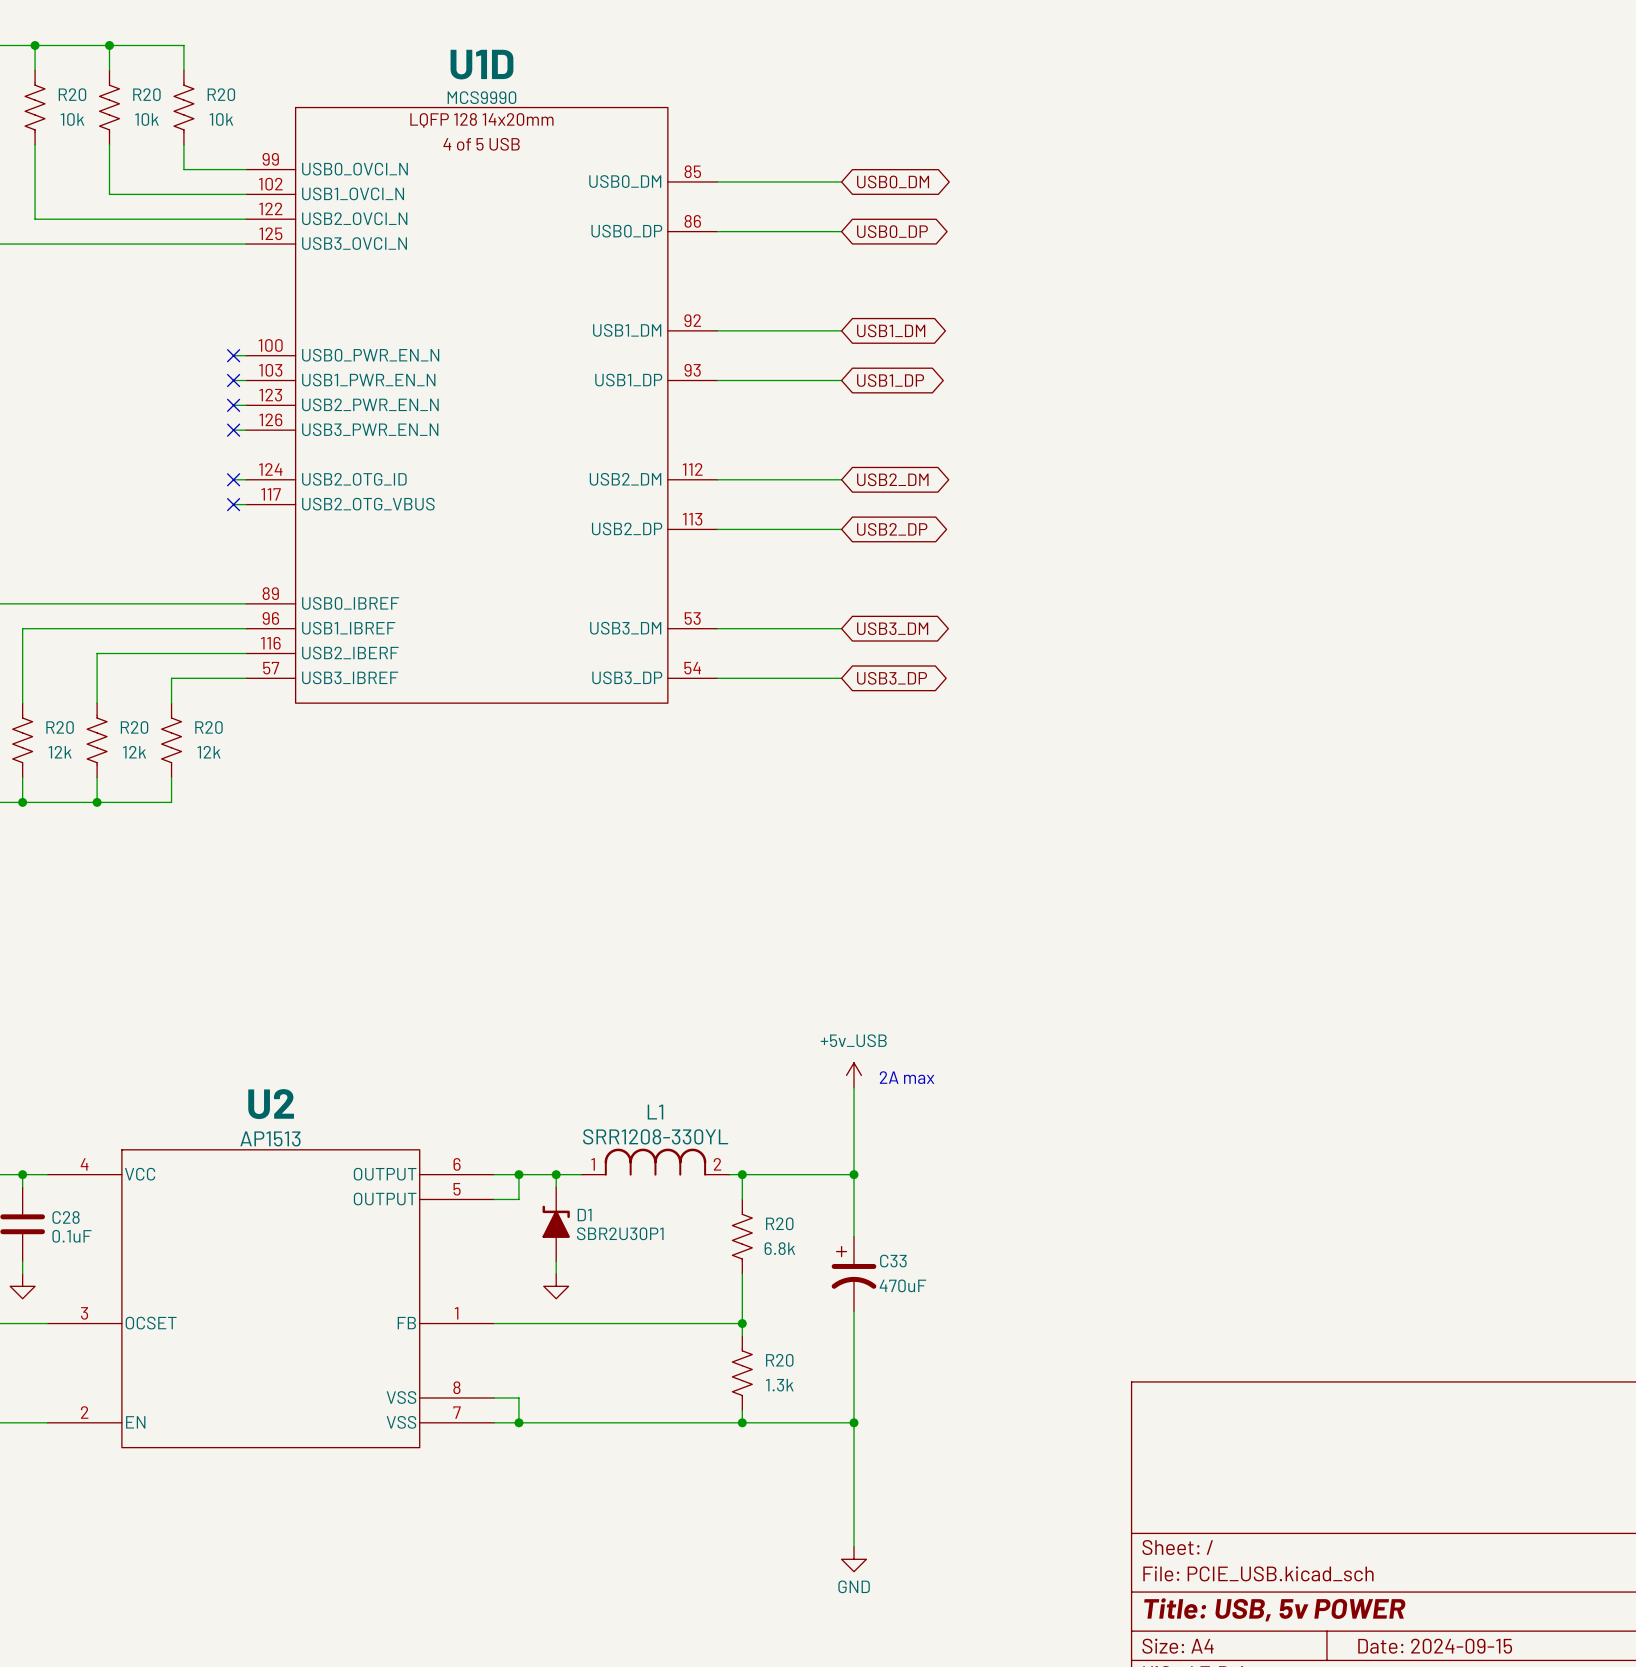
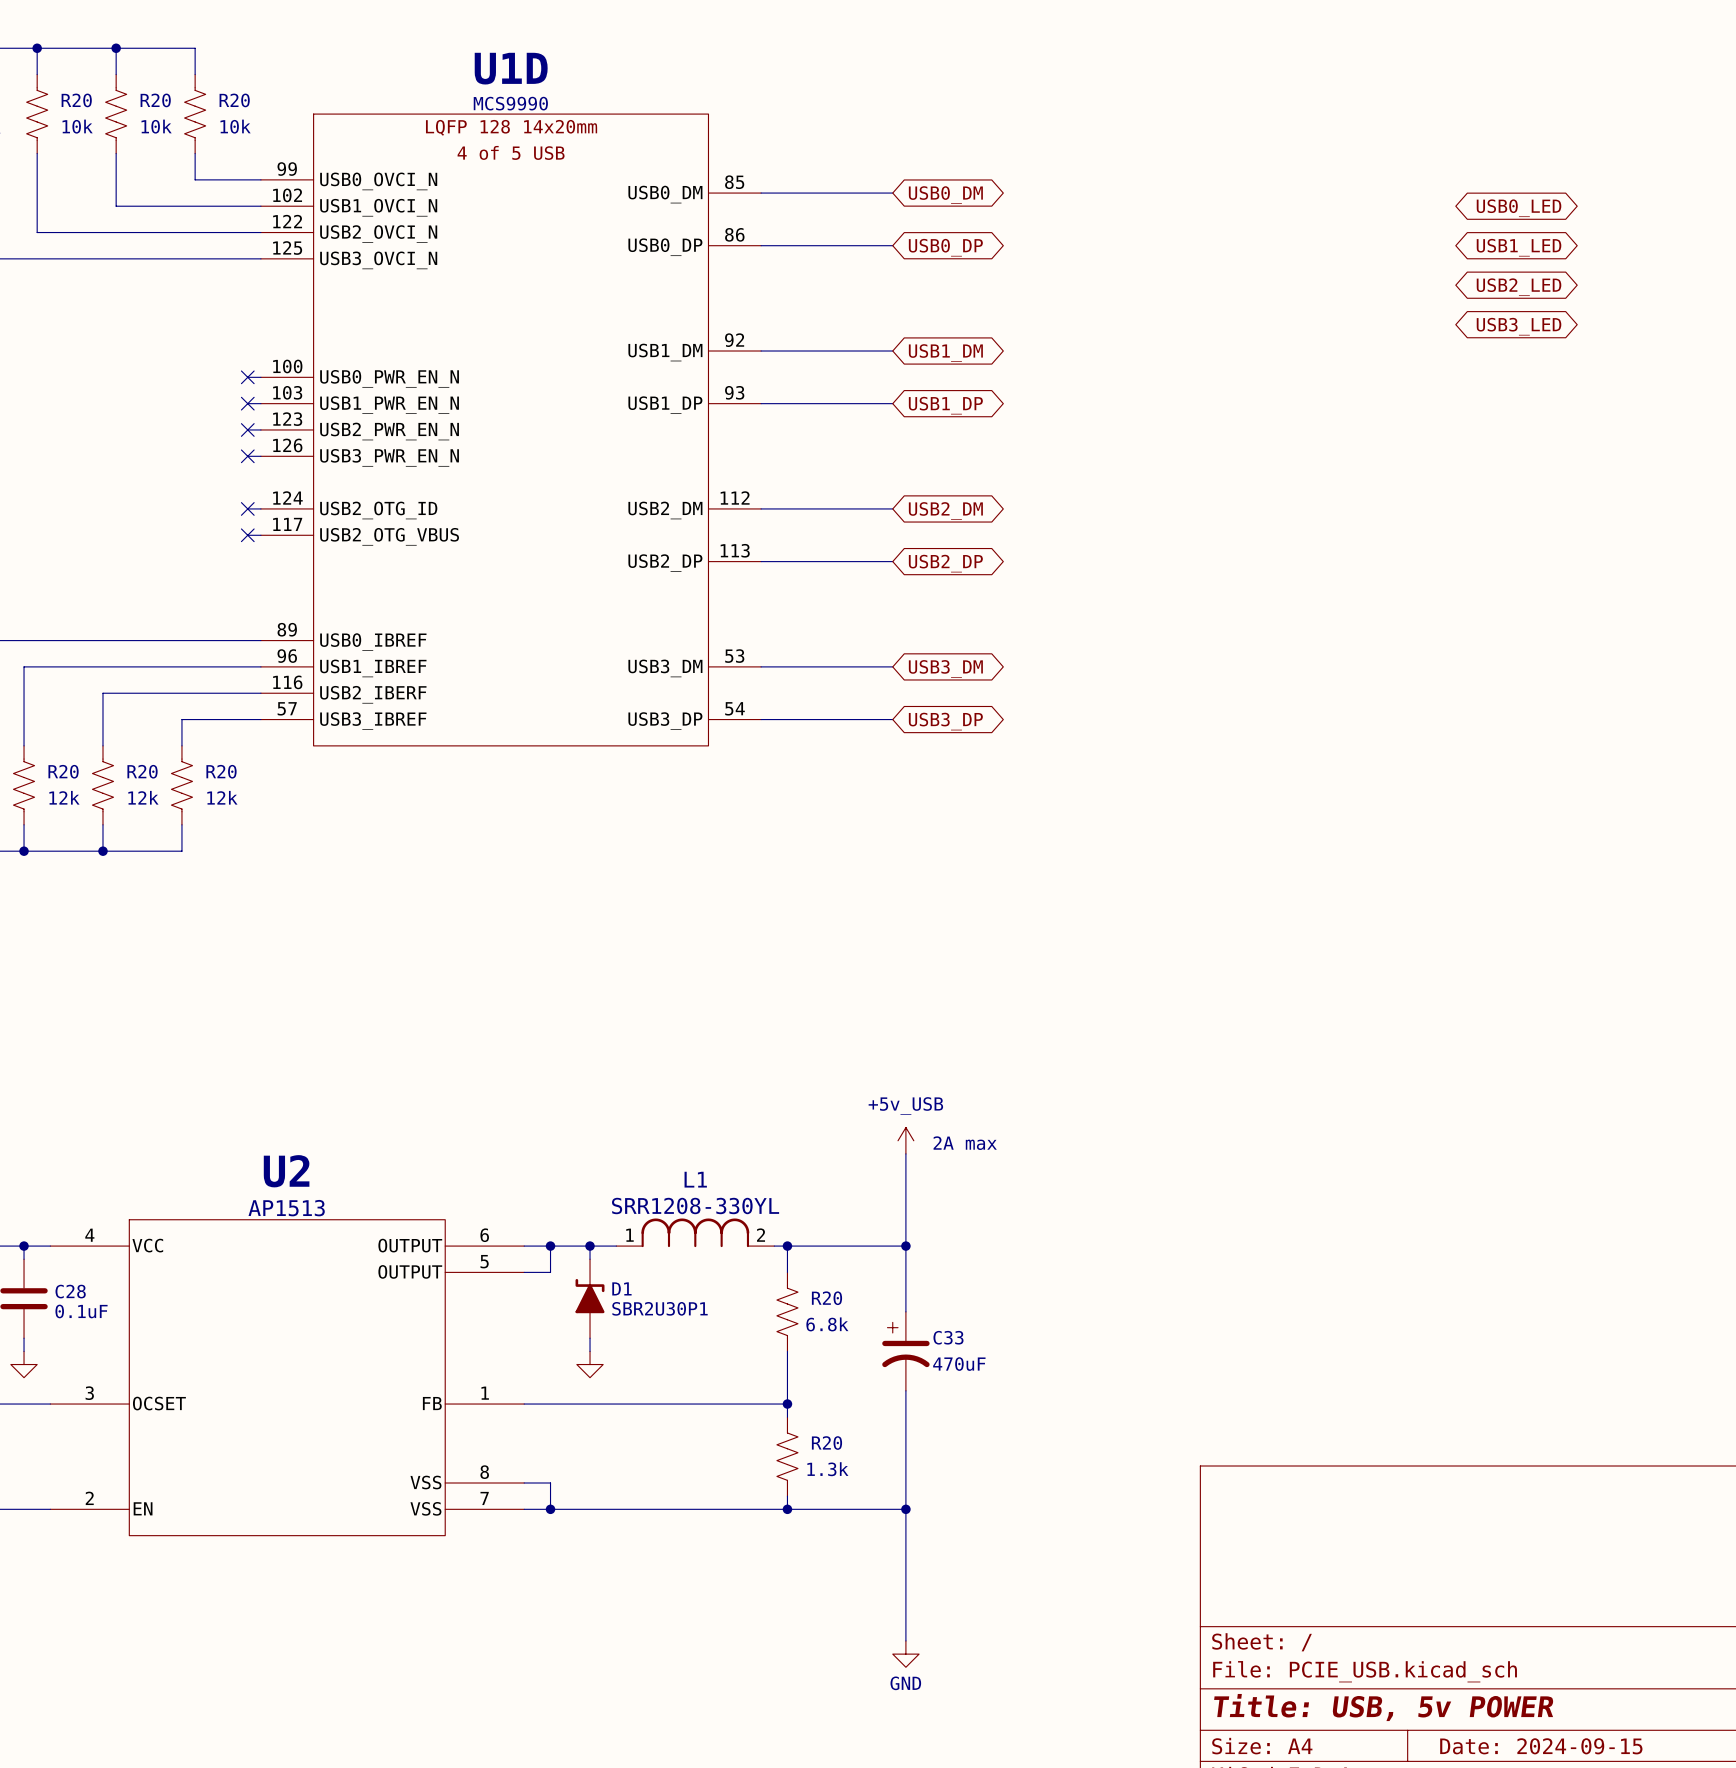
global label: none -> USB0_LED (1519, 208)
global label: none -> USB1_LED (1519, 247)
global label: none -> USB2_LED (1519, 287)
global label: none -> USB3_LED (1519, 326)

